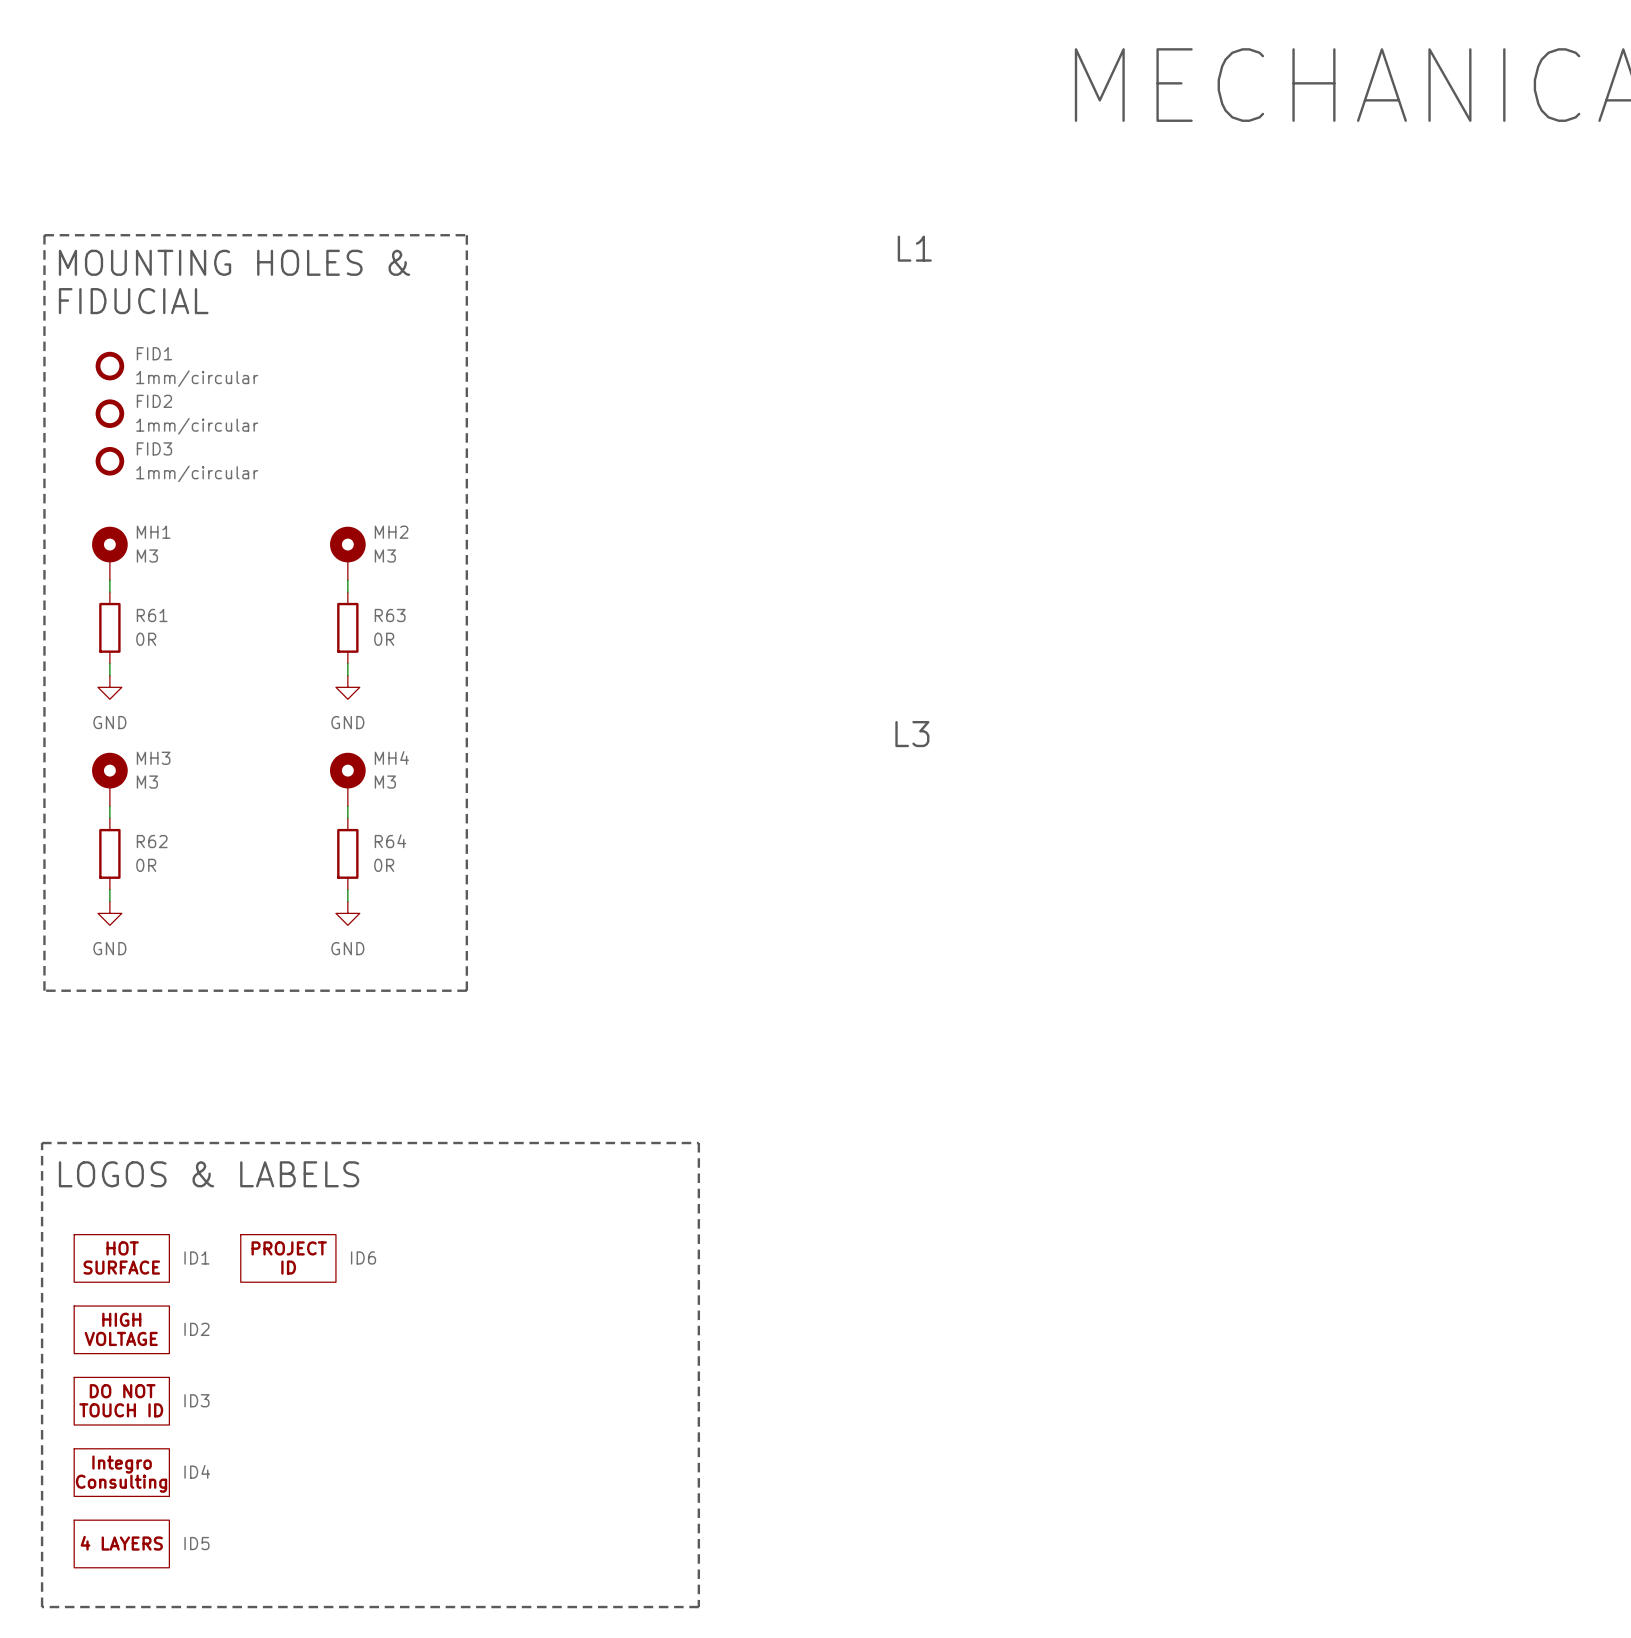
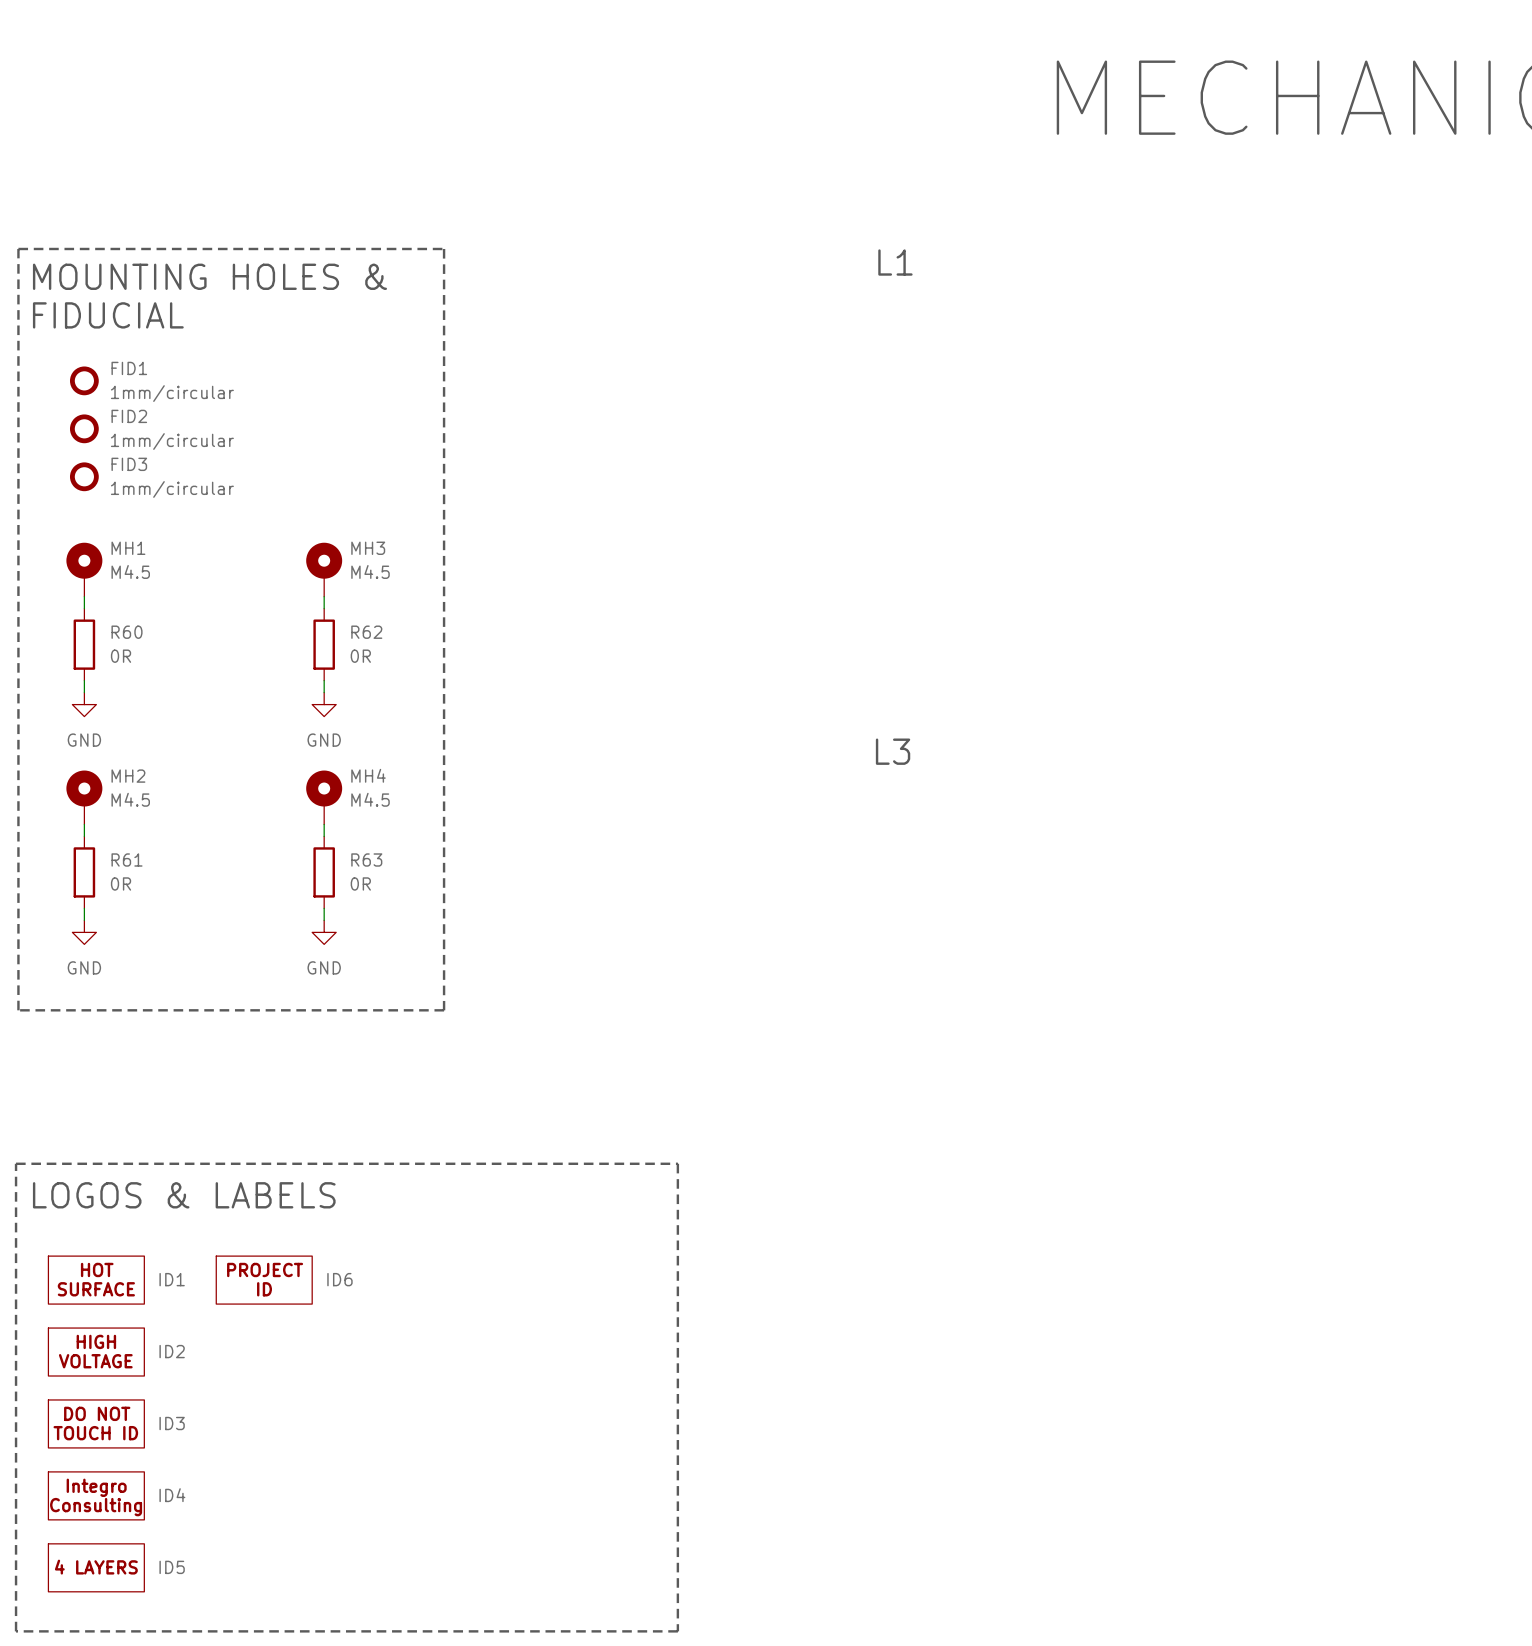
MH2 name: MH2 (391, 532) -> MH3 (368, 548)
MH1 value: M3 (147, 556) -> M4.5 (130, 571)
MH2 value: M3 (385, 556) -> M4.5 (370, 571)
R61 name: R61 (152, 615) -> R60 (127, 632)
R63 name: R63 (390, 615) -> R62 (366, 632)
MH3 name: MH3 (153, 758) -> MH2 (128, 776)
MH3 value: M3 (147, 782) -> M4.5 (130, 799)
MH4 value: M3 (385, 782) -> M4.5 (370, 799)
R62 name: R62 (152, 841) -> R61 (127, 860)
R64 name: R64 (390, 841) -> R63 (366, 860)

